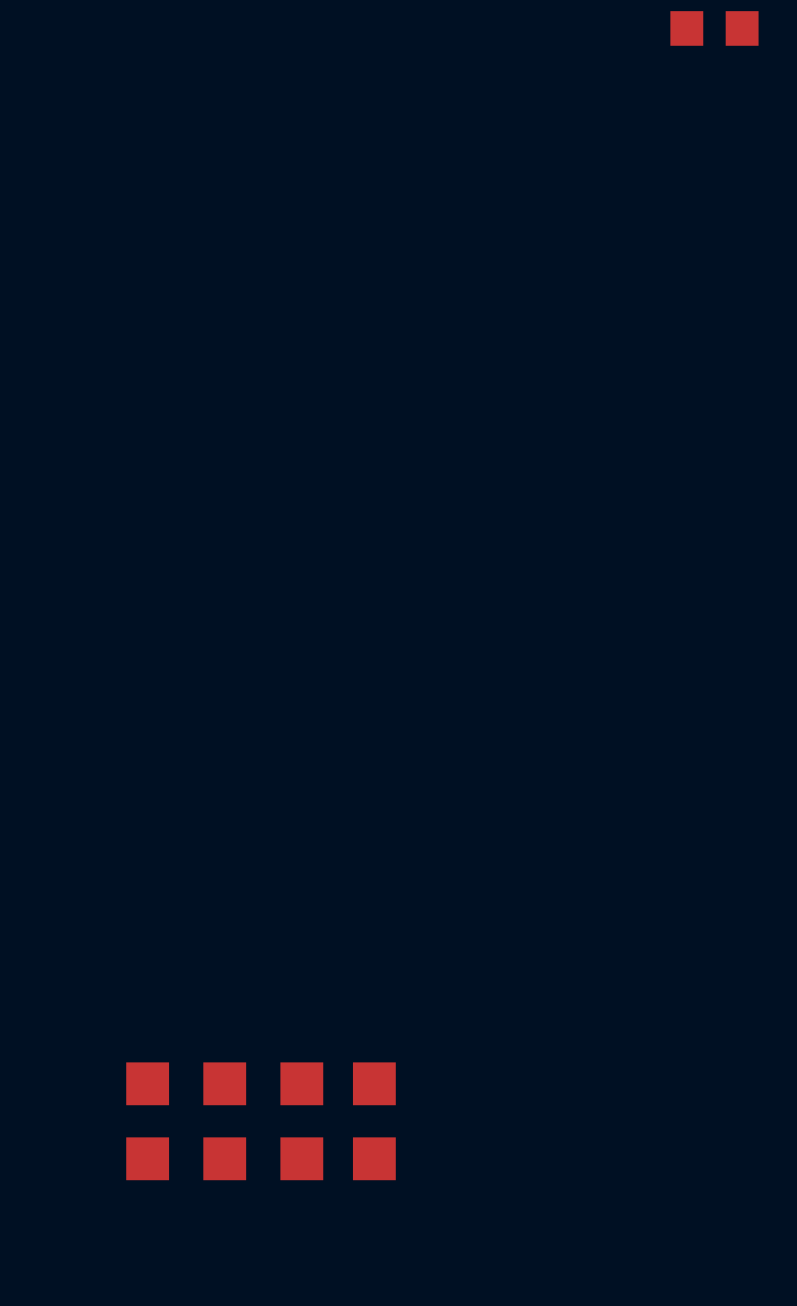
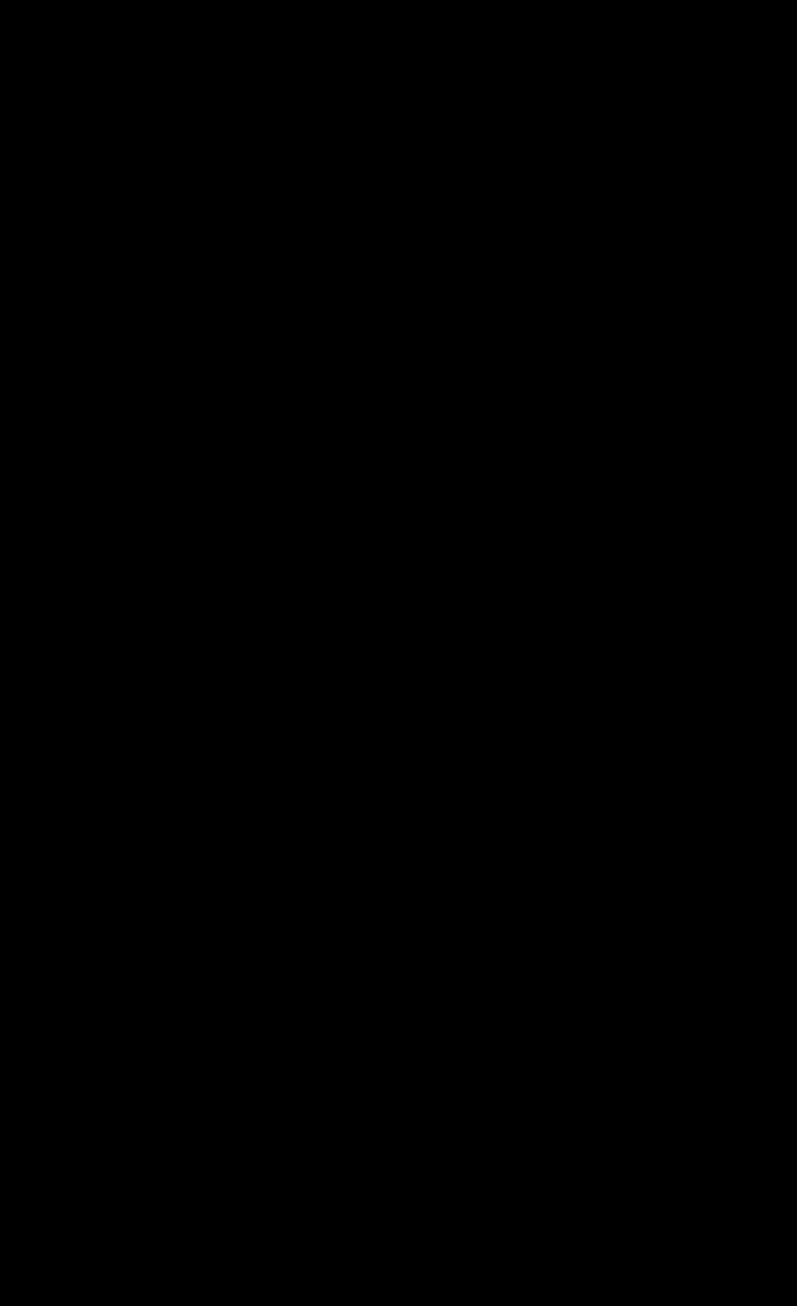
part: (714, 28) -> none
part: (147, 1121) -> none
part: (224, 1121) -> none
part: (301, 1121) -> none
part: (374, 1121) -> none

